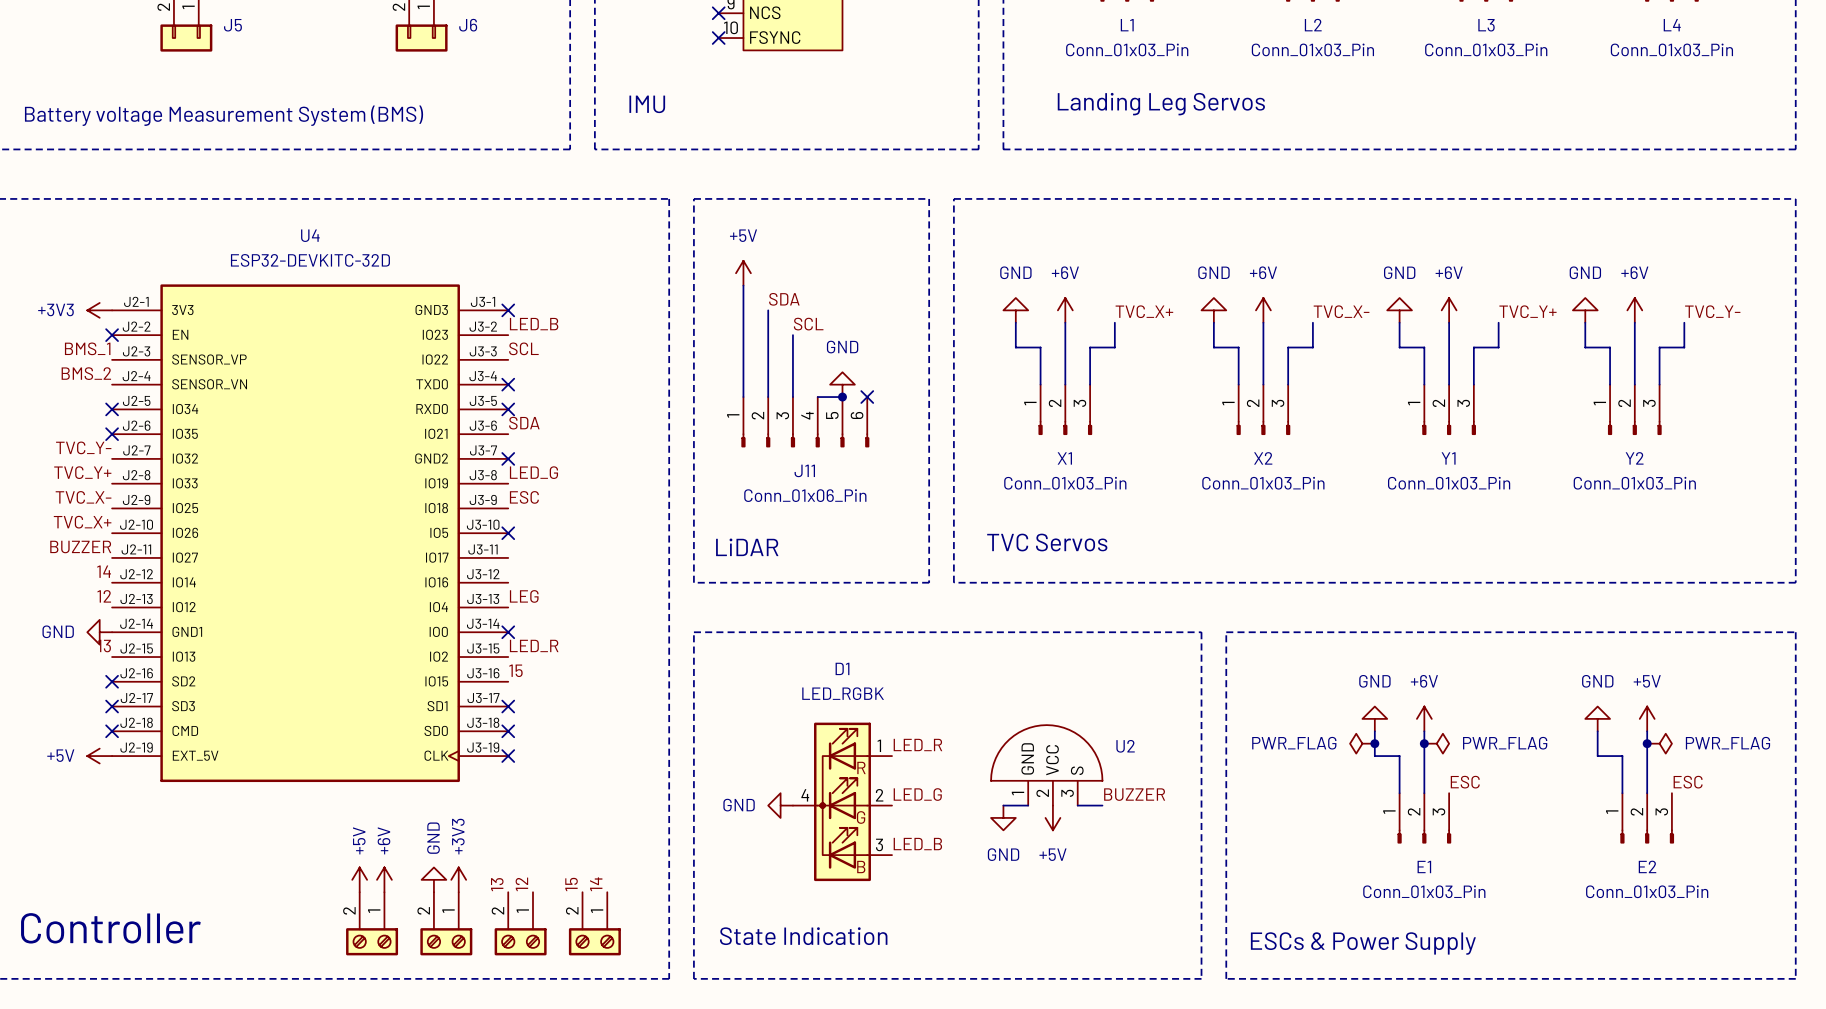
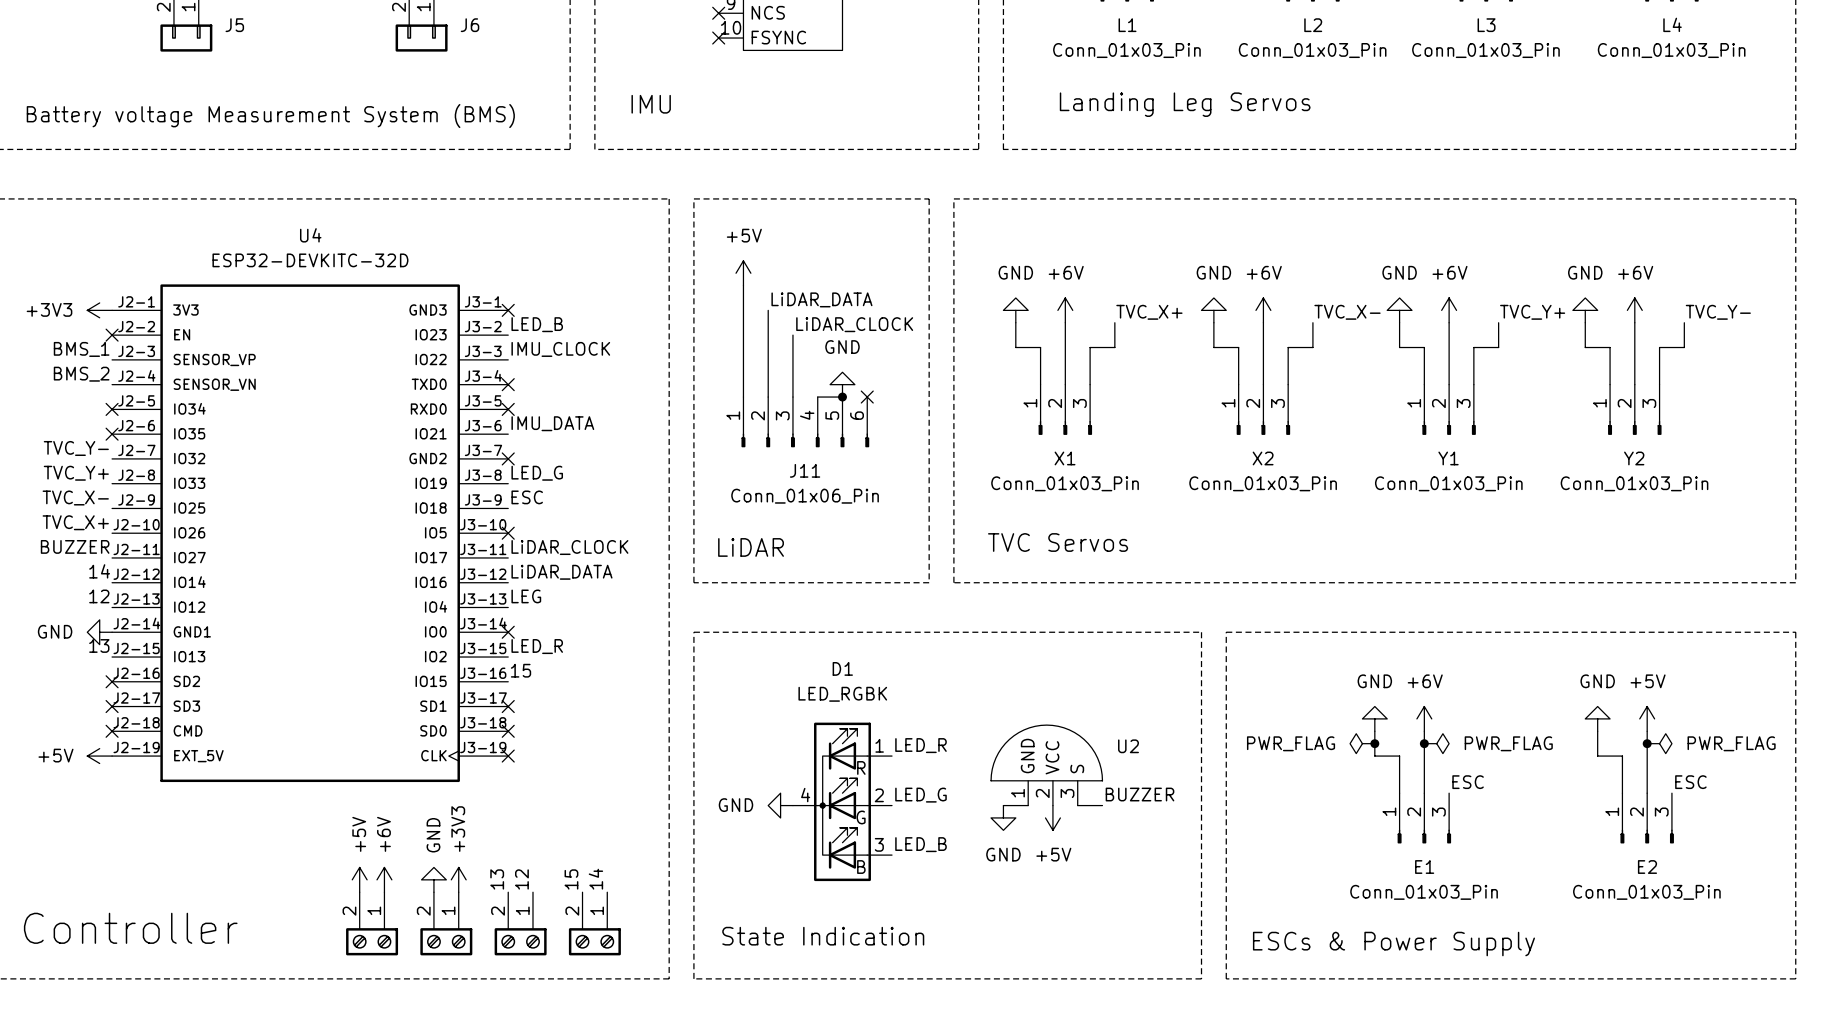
label: SDA (784, 299) -> LiDAR_DATA (821, 299)
label: SCL (808, 324) -> LiDAR_CLOCK (854, 324)
label: SCL (523, 348) -> IMU_CLOCK (560, 349)
label: SDA (524, 423) -> IMU_DATA (552, 423)
label: none -> LiDAR_CLOCK (569, 547)
label: none -> LiDAR_DATA (561, 572)

